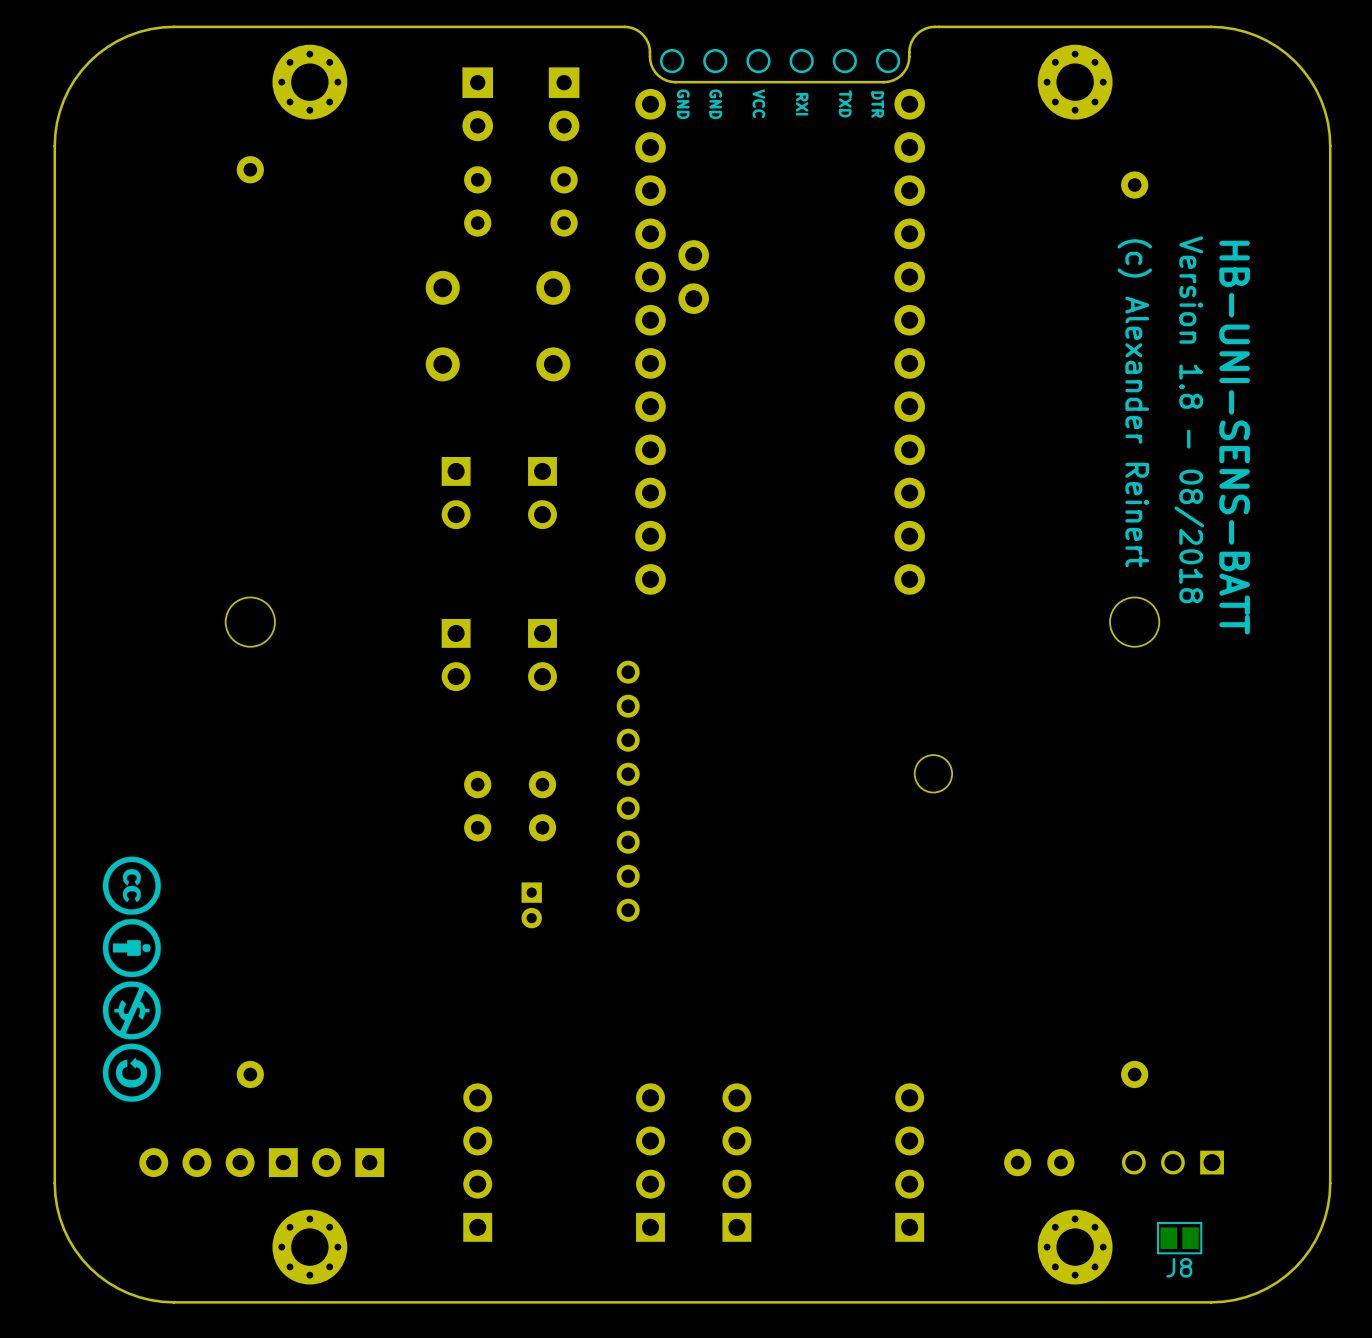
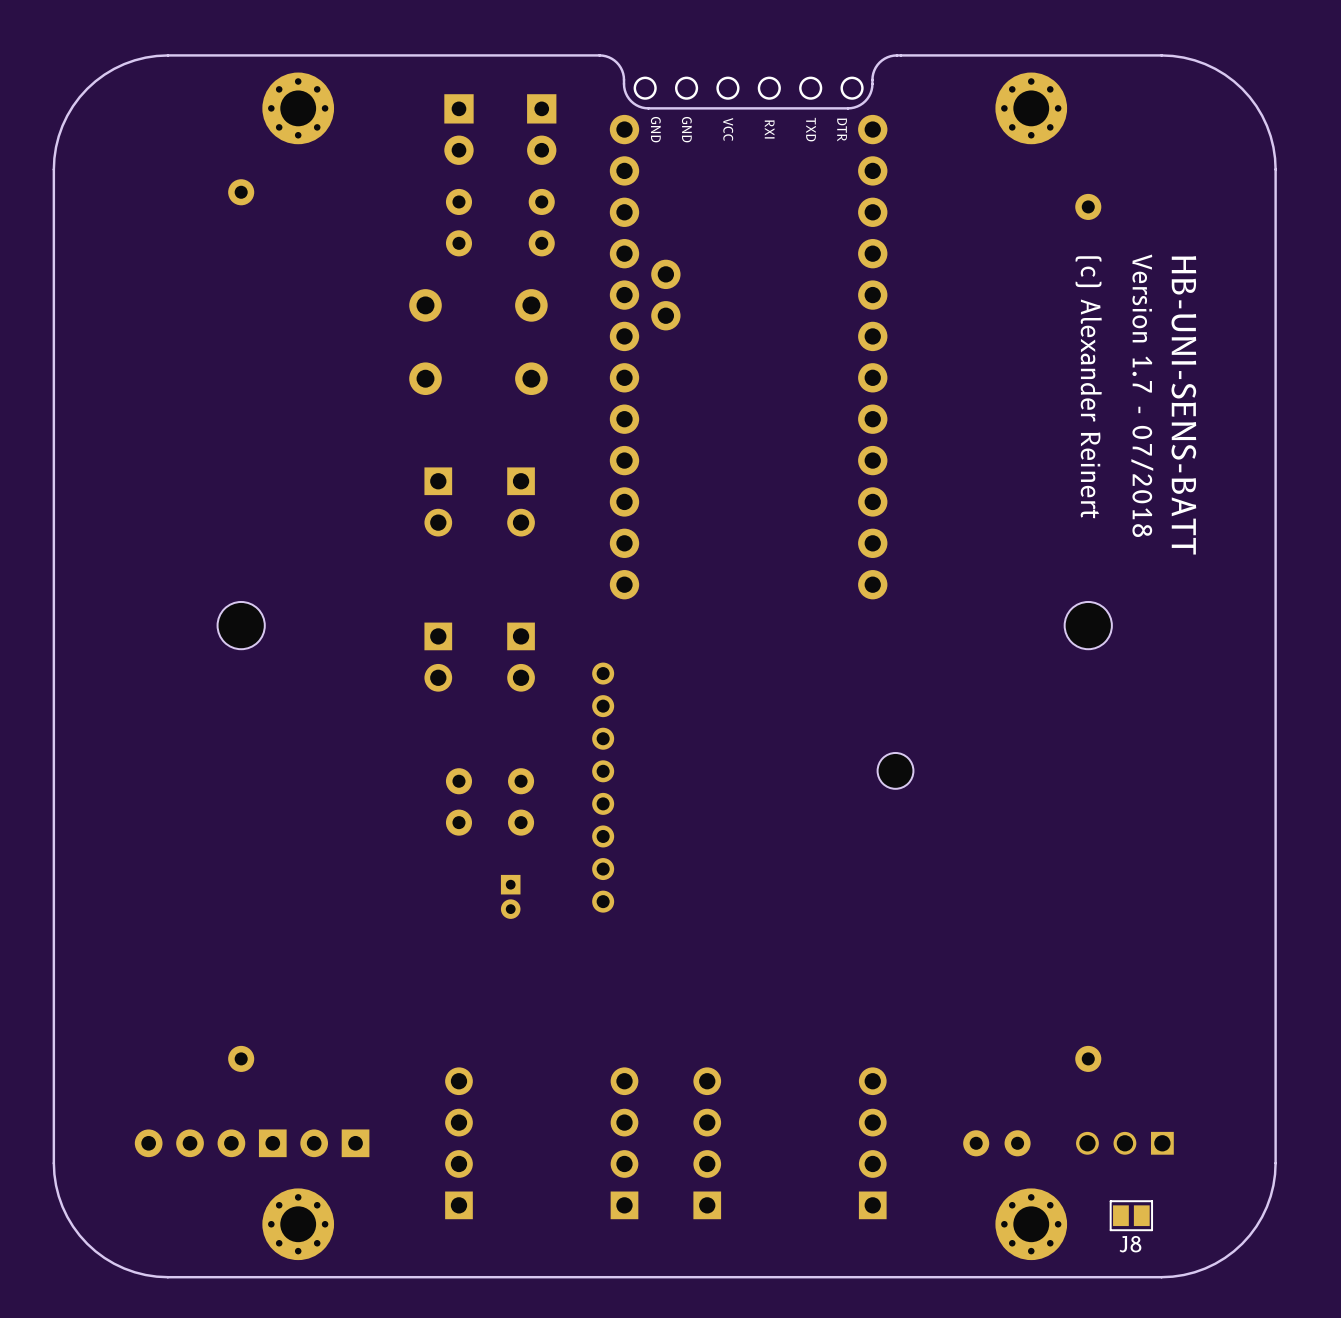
text: Version 1.8 - 08/2018 (1189, 419) -> Version 1.7 - 07/2018 (1142, 395)
drawing: [102, 856, 161, 1102] -> none

